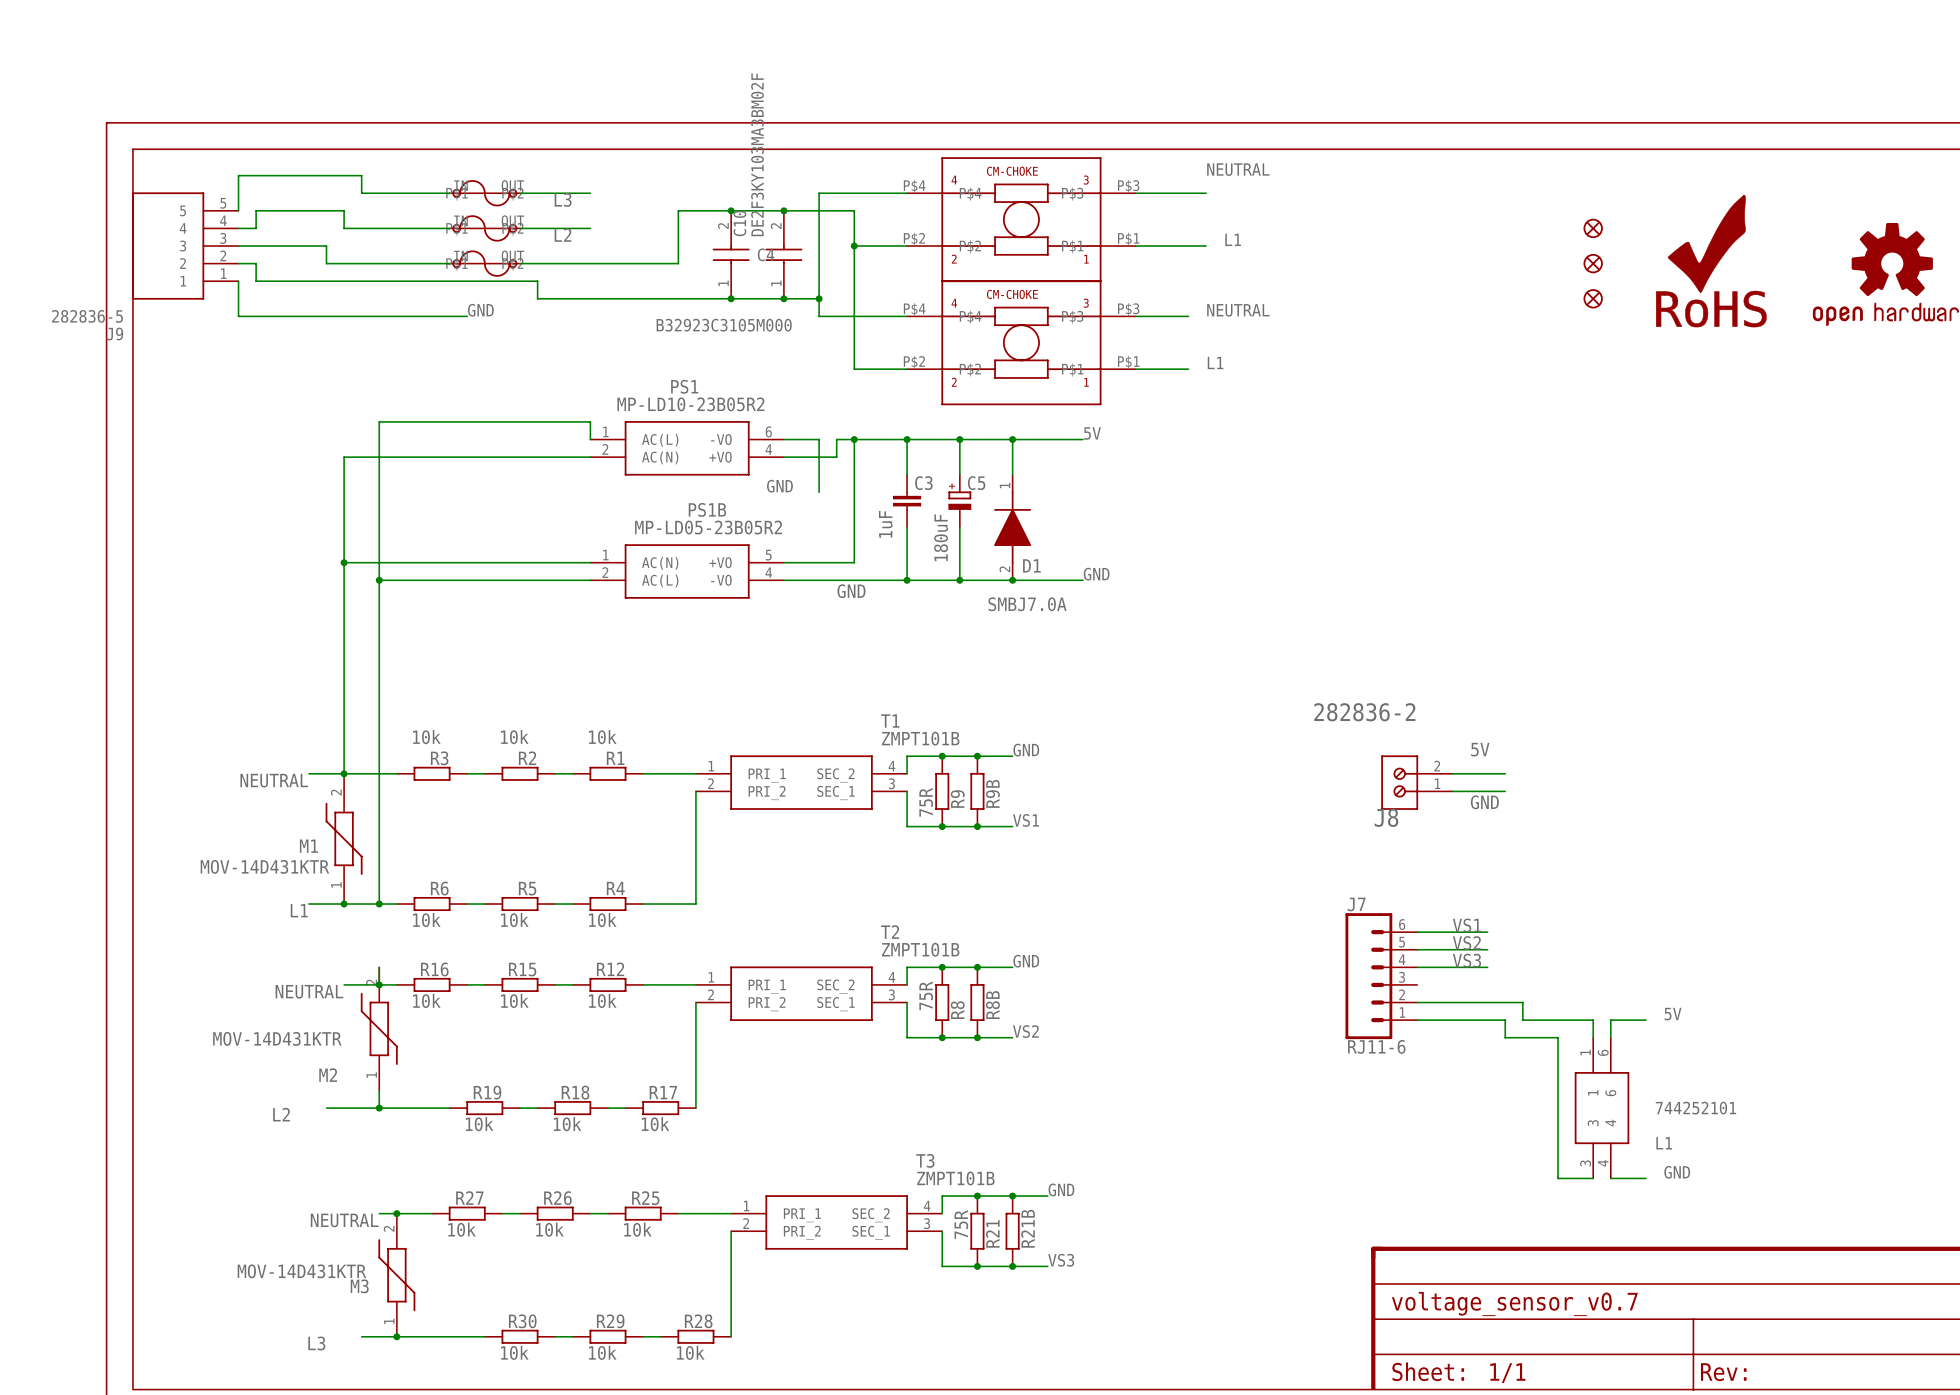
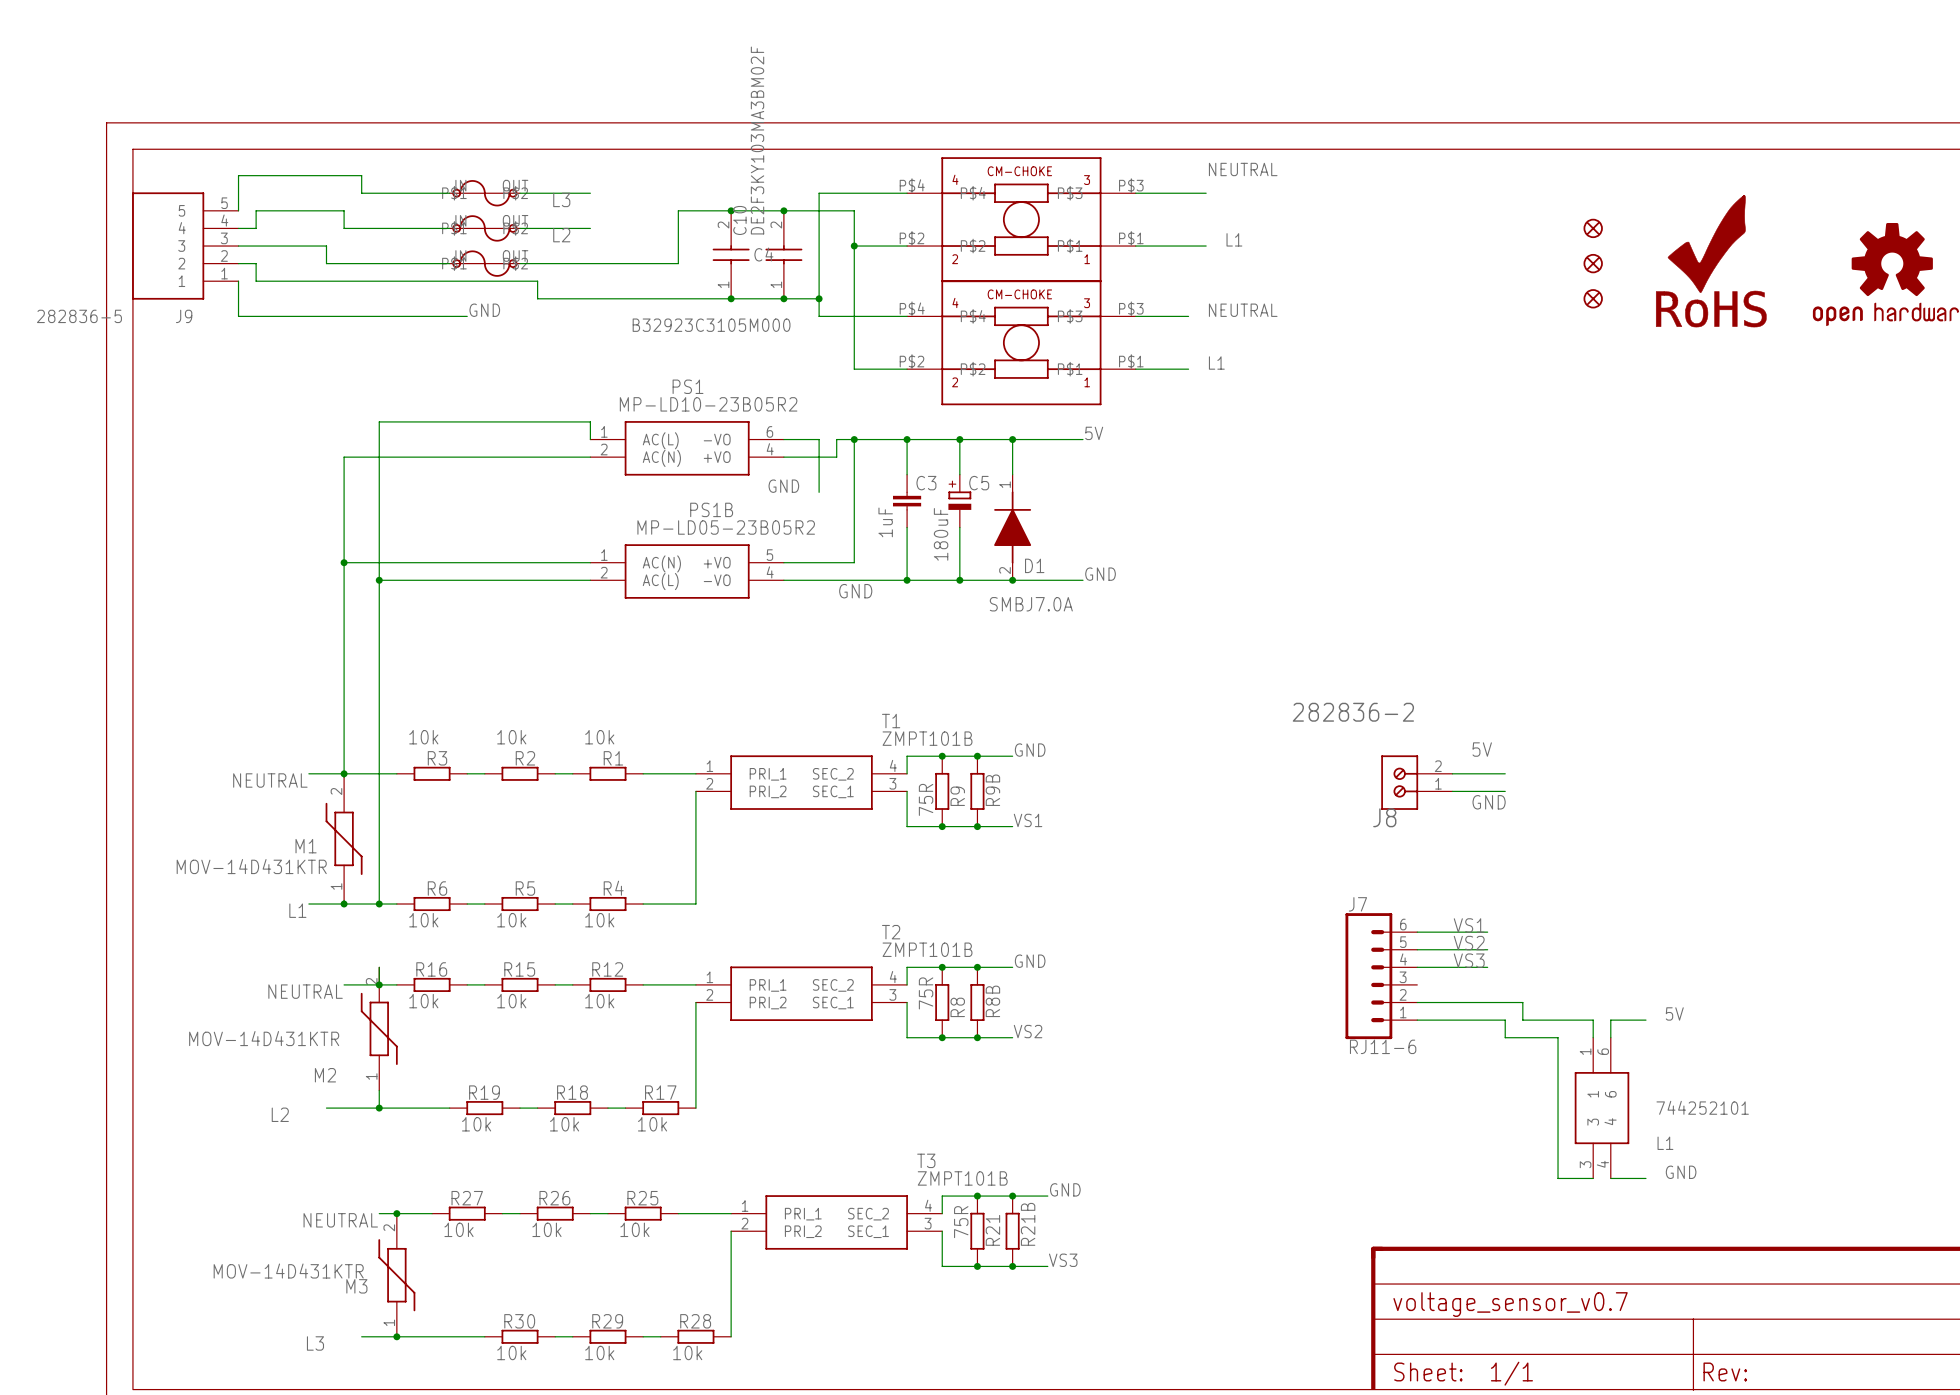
J9 name position: J9 (114, 333) -> J9 (184, 316)

